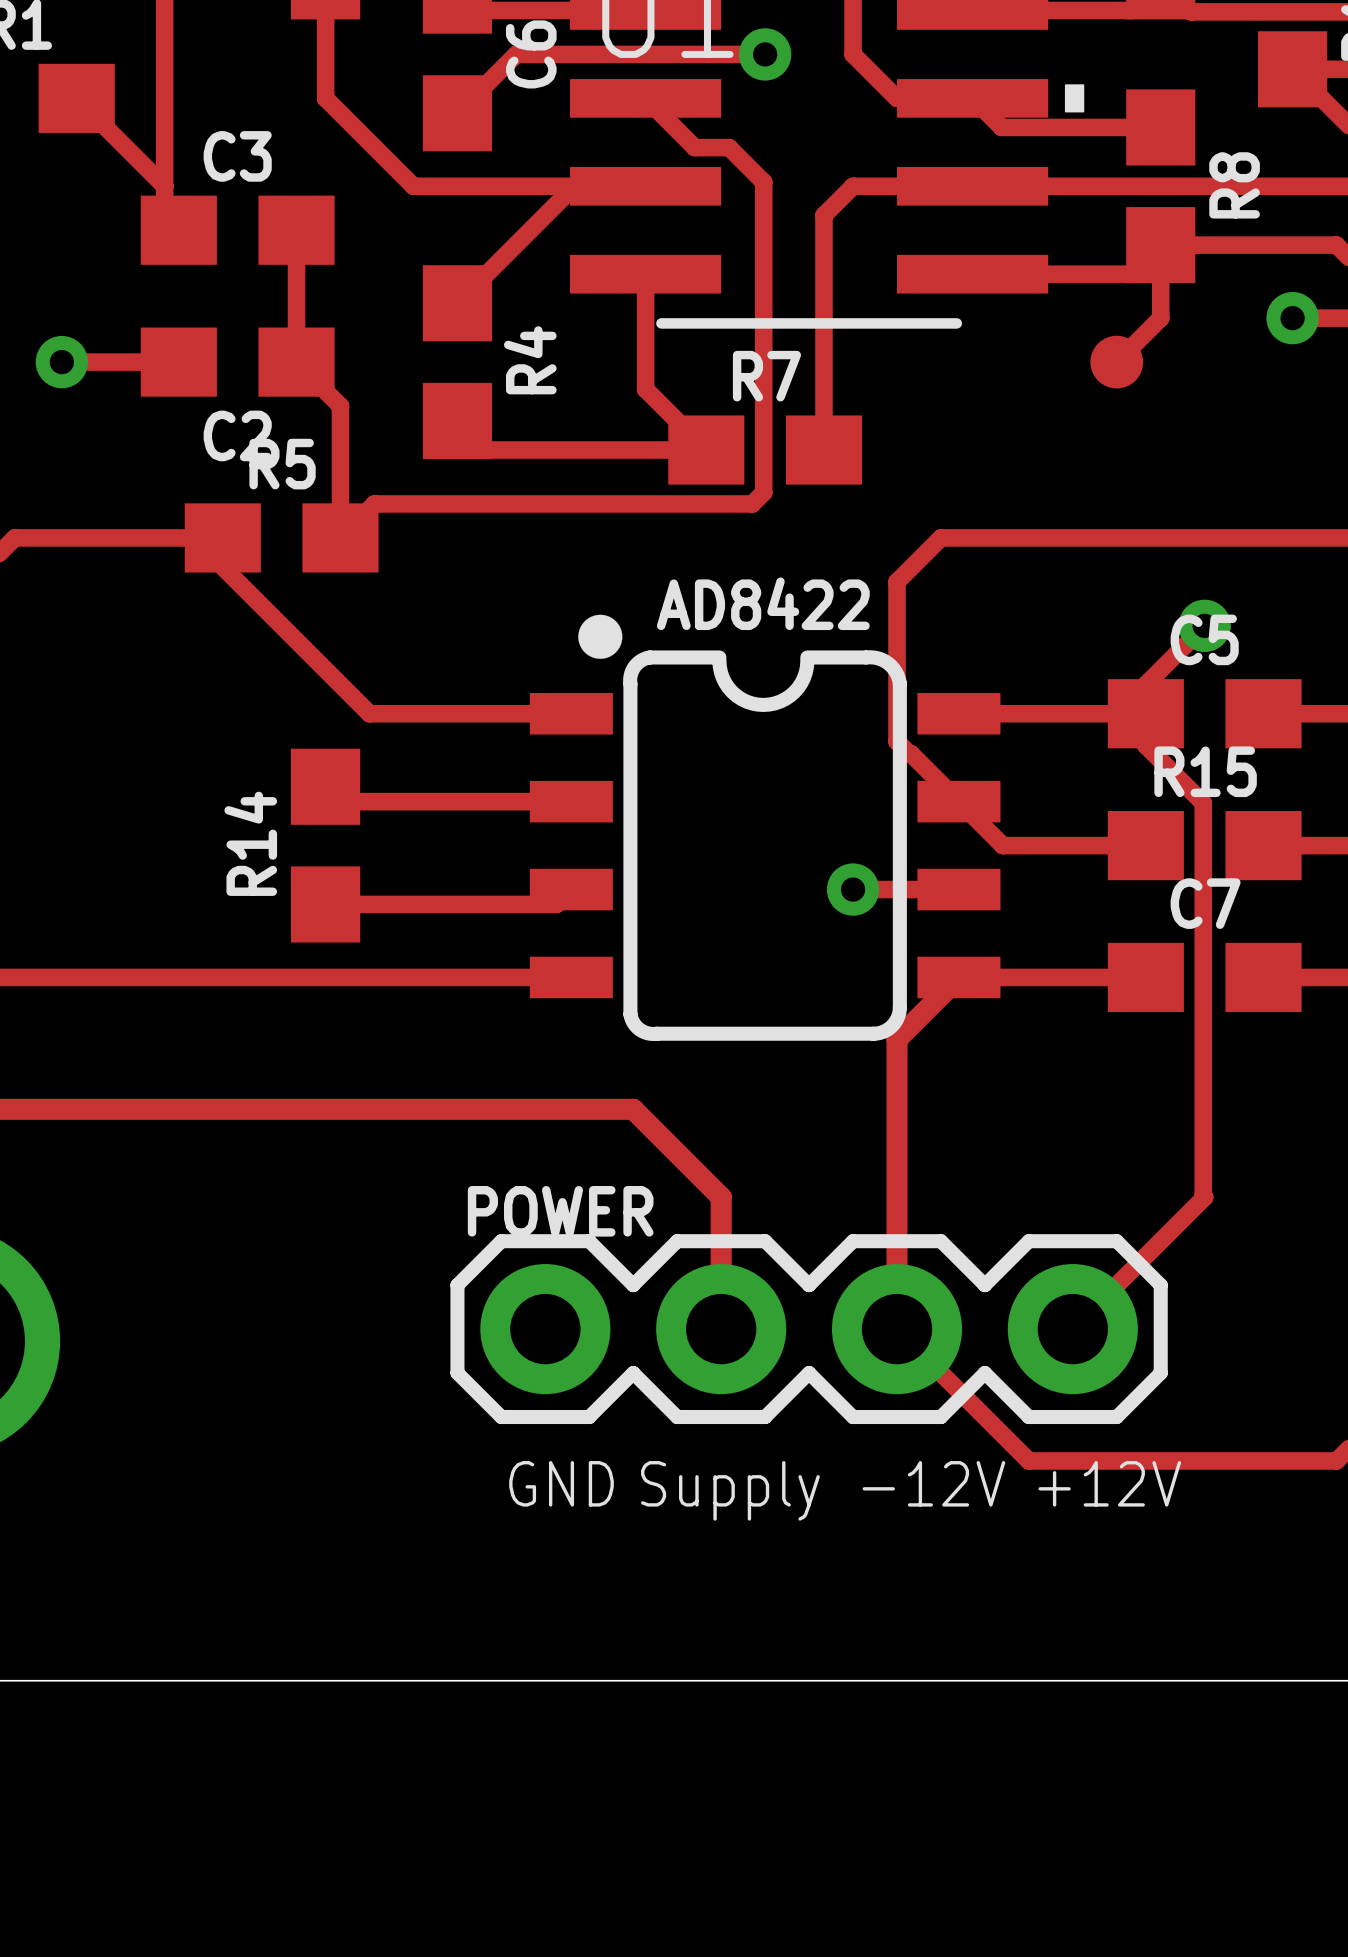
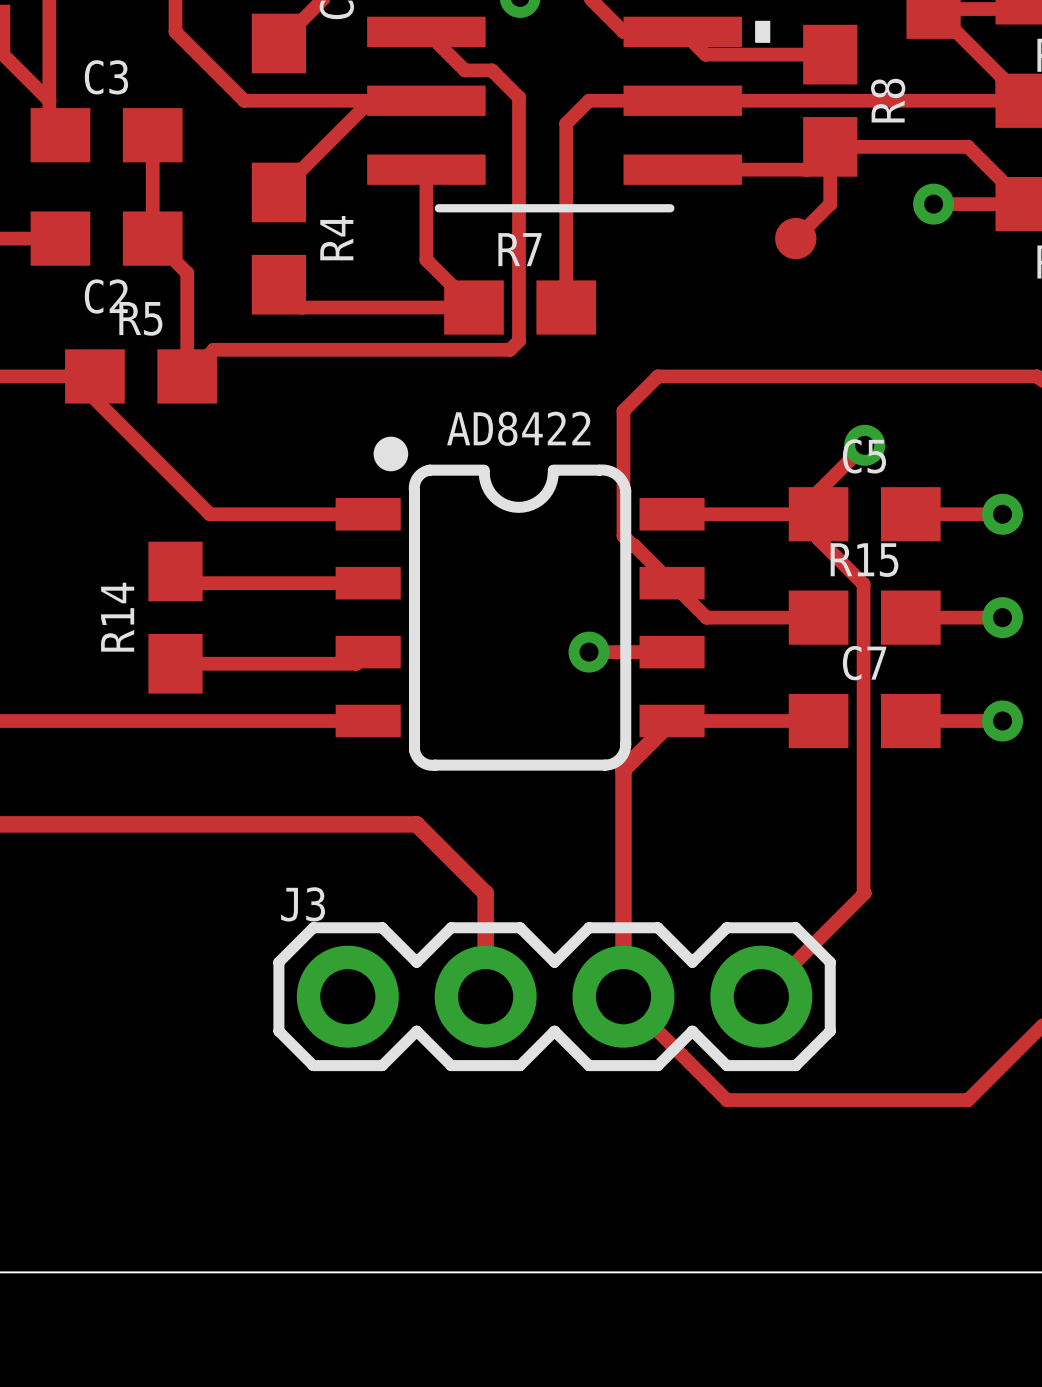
POWER name: POWER (560, 1211) -> J3 (303, 904)
text: GND (561, 1483) -> none
text: -12V (933, 1483) -> none
text: +12V (1109, 1483) -> none
text: Supply (730, 1490) -> none

